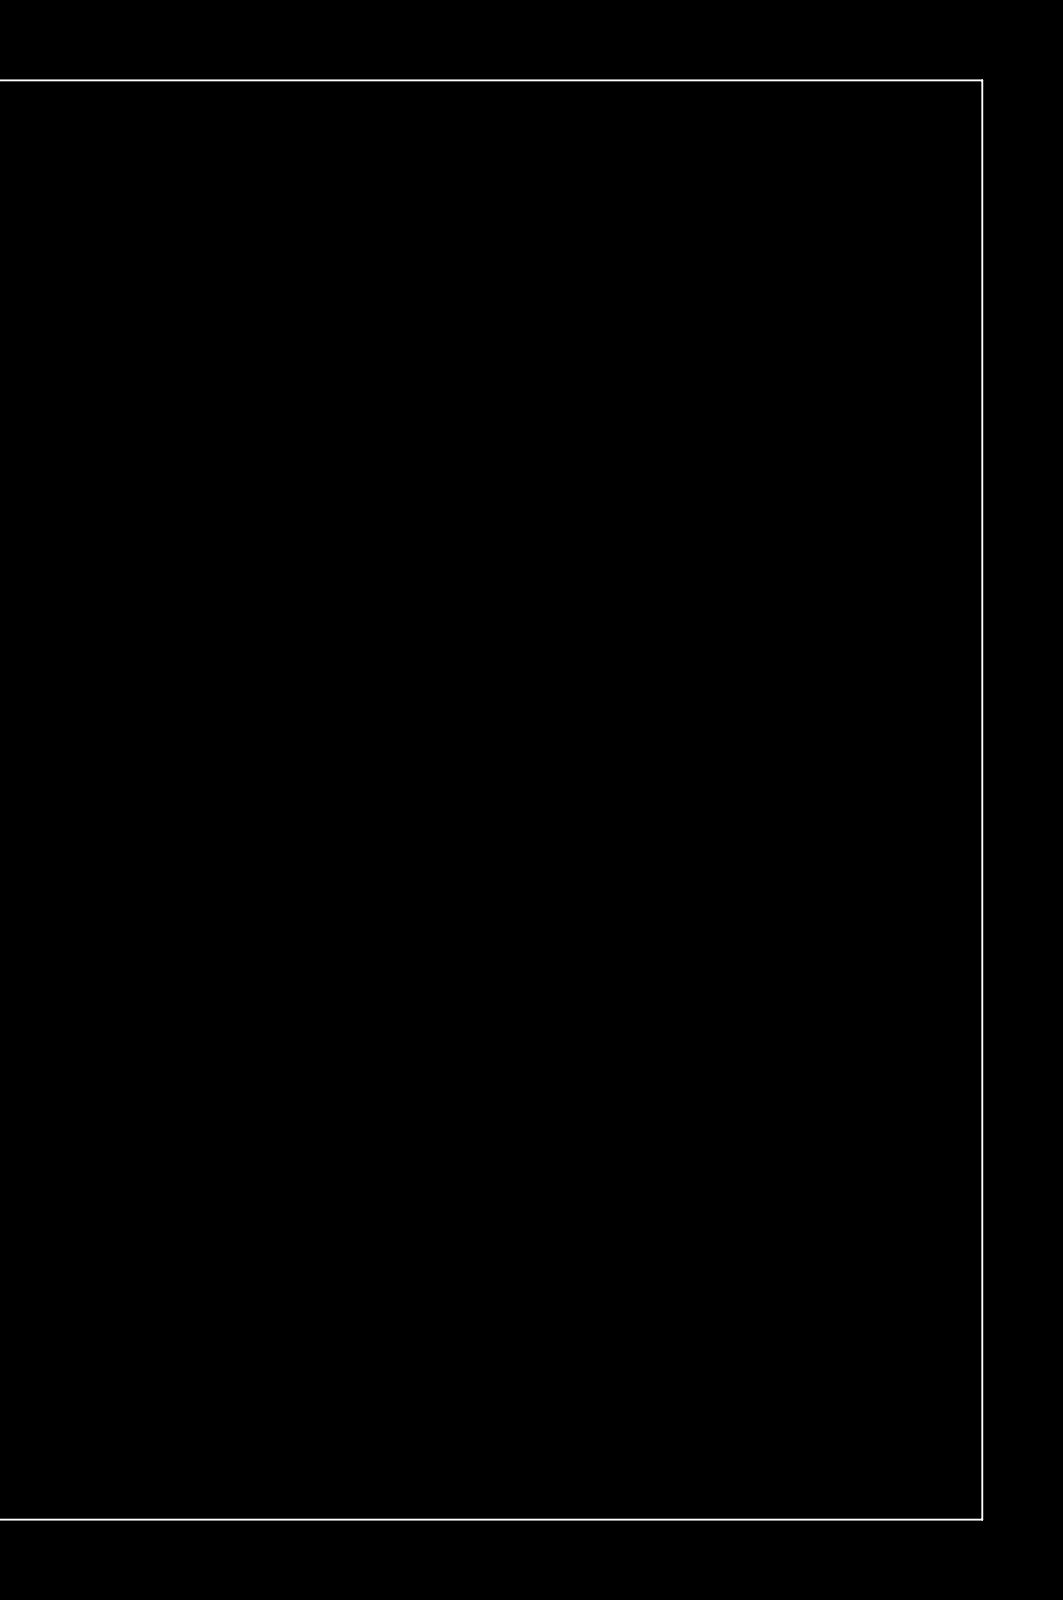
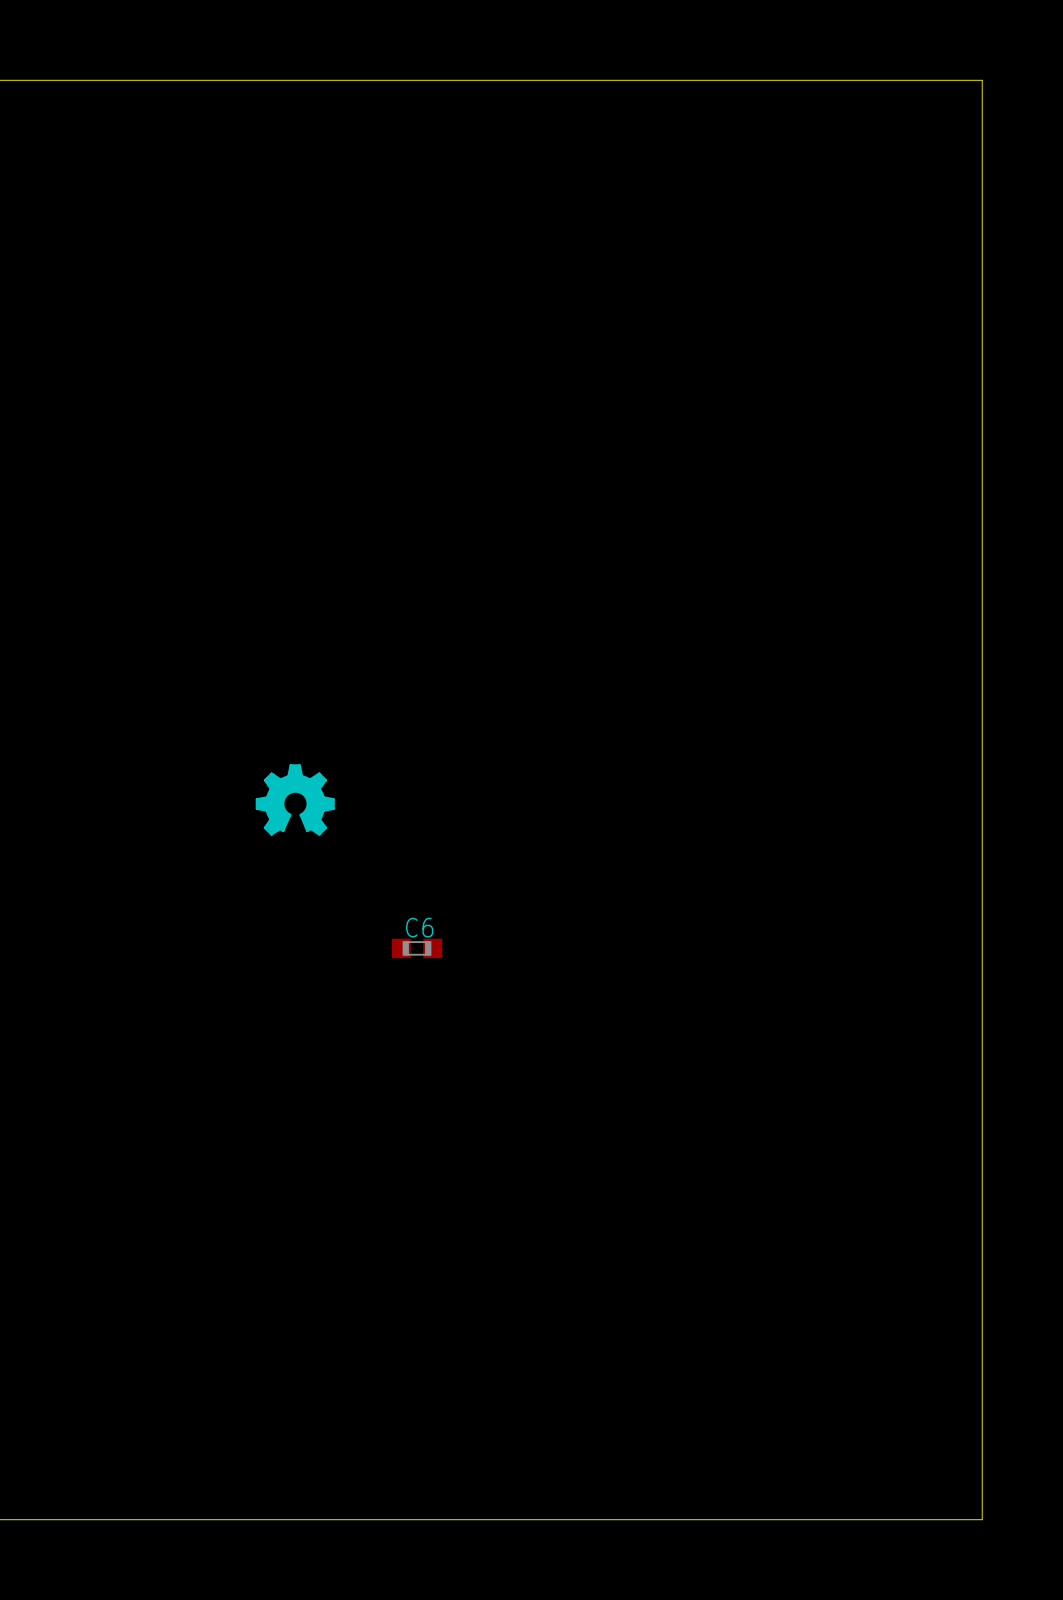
drawing: none -> [255, 764, 335, 836]
C6: none -> (417, 948)

